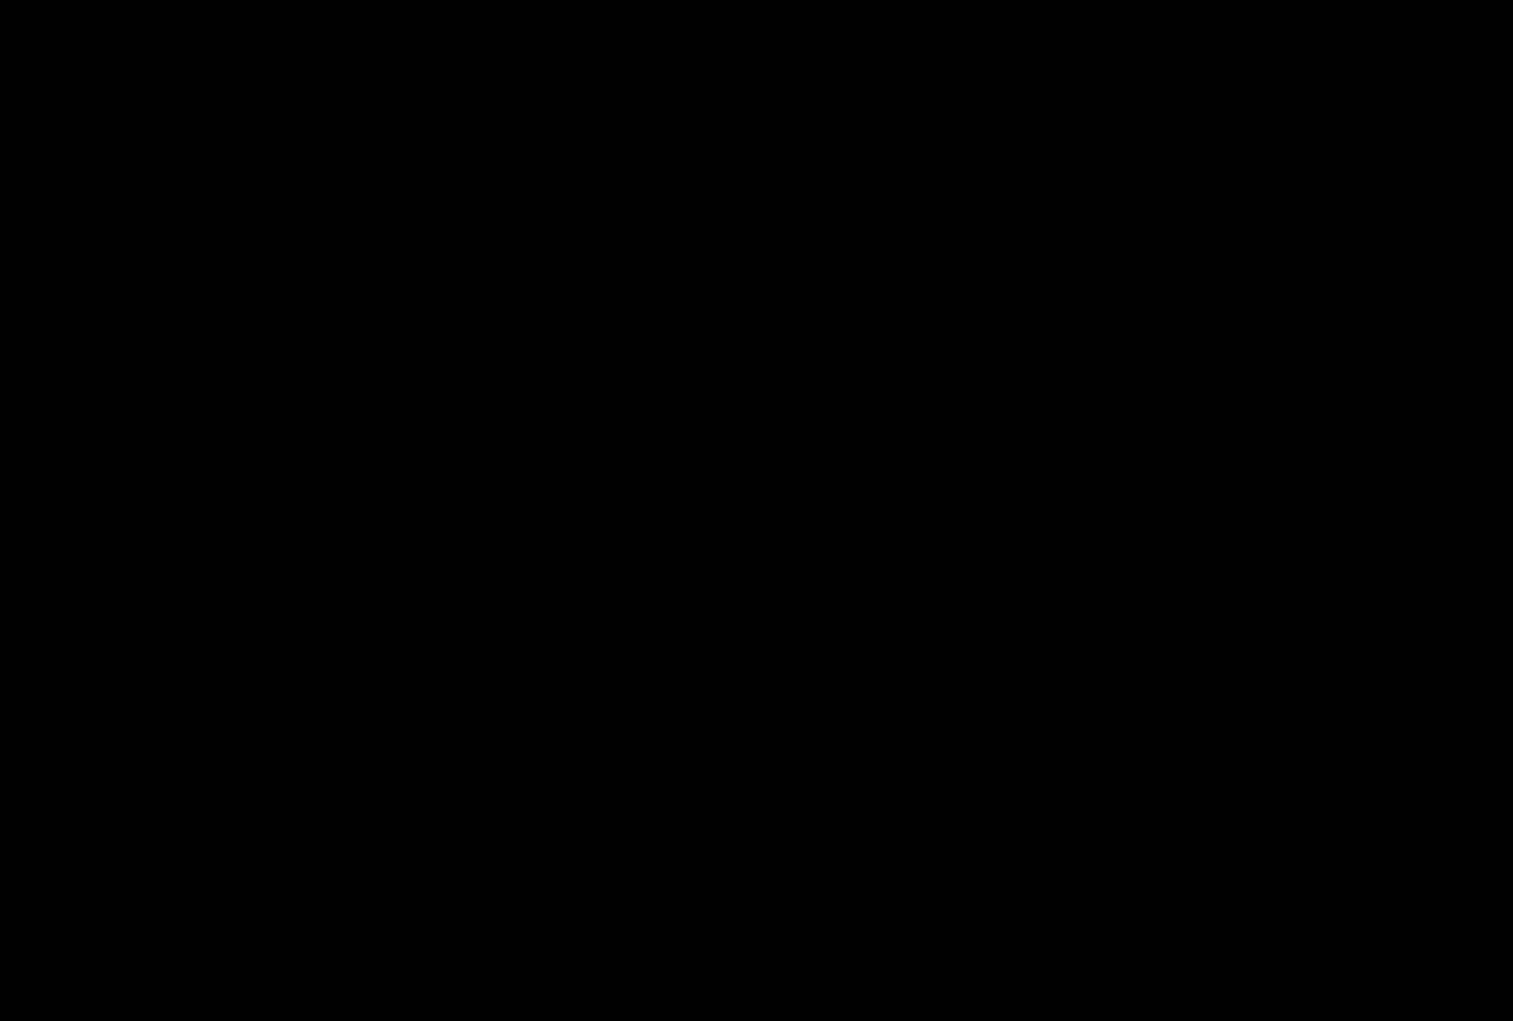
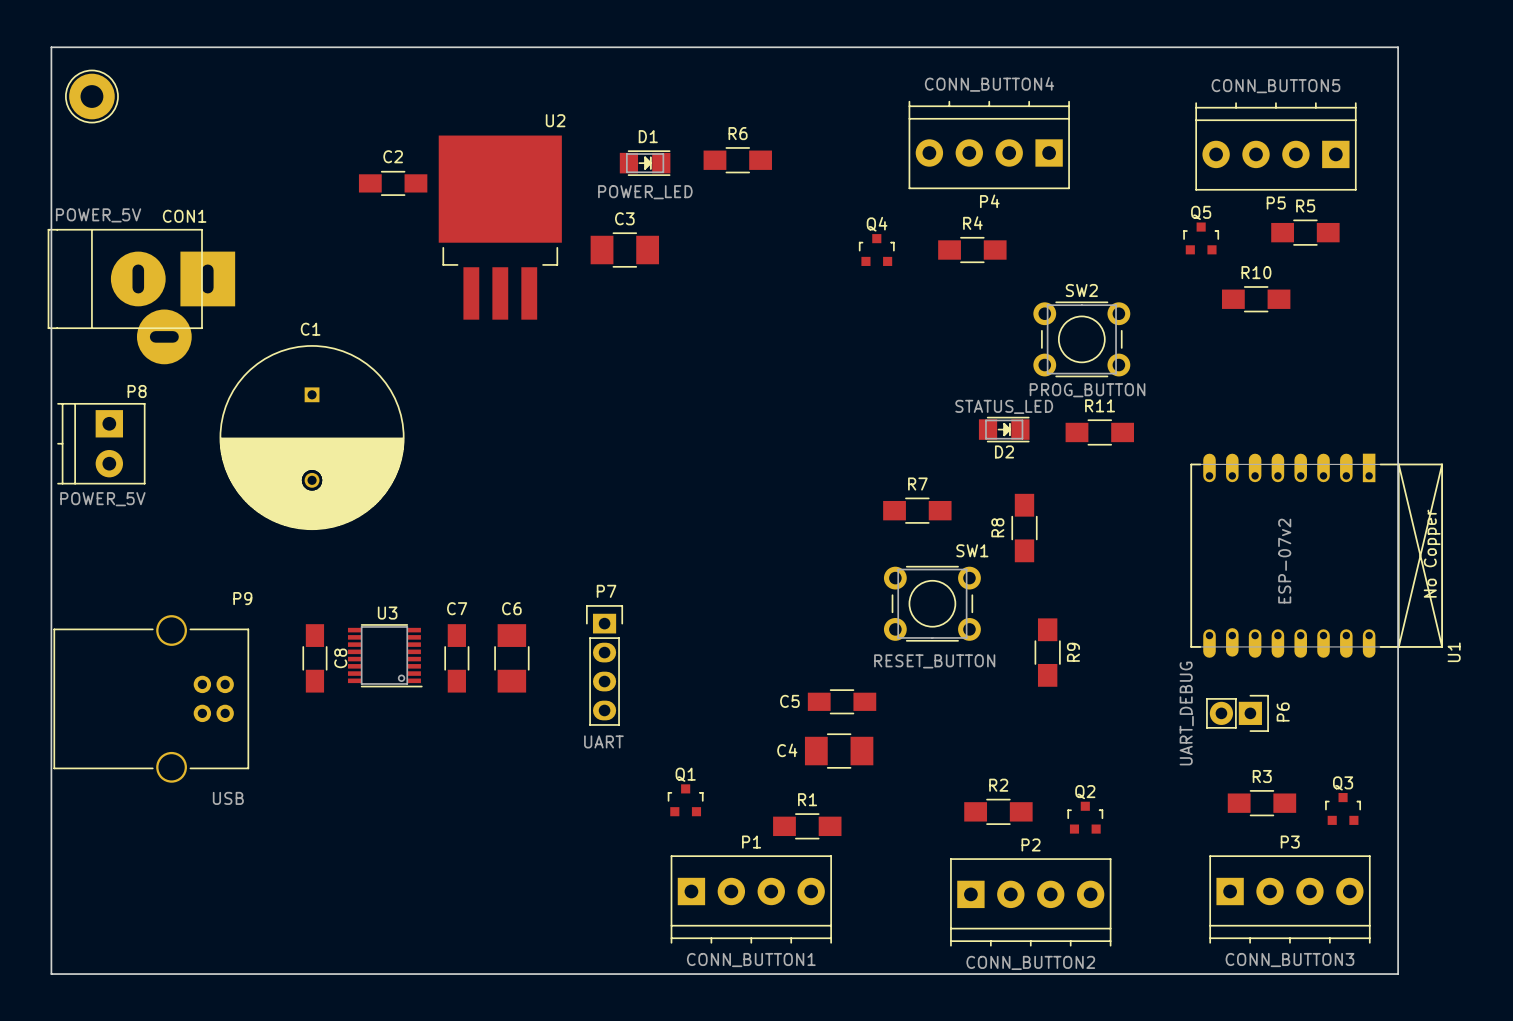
board edge: none -> (51, 47) (1398, 47) (1398, 974) (51, 974) (51, 47)
part: none -> (91, 96)
P4: none -> CONN_BUTTON4 (989, 145)
P5: none -> CONN_BUTTON5 (1275, 146)
R6: none -> (737, 160)
D1: none -> POWER_LED (645, 163)
C2: none -> (393, 183)
U2: none -> (500, 227)
R5: none -> (1305, 232)
Q5: none -> (1201, 238)
C3: none -> (624, 250)
Q4: none -> (876, 250)
R4: none -> (972, 250)
CON1: none -> POWER_5V (141, 296)
R10: none -> (1256, 299)
SW2: none -> PROG_BUTTON (1081, 339)
D2: none -> STATUS_LED (1004, 429)
R11: none -> (1099, 432)
C1: none -> (312, 437)
P8: none -> POWER_5V (101, 443)
R7: none -> (917, 510)
R8: none -> (1024, 528)
U1: none -> ESP-07v2 (1316, 555)
SW1: none -> RESET_BUTTON (932, 603)
R9: none -> (1047, 652)
U3: none -> (385, 655)
C8: none -> (314, 658)
C7: none -> (456, 658)
C6: none -> (511, 658)
P7: none -> UART (604, 665)
P9: none -> USB (151, 698)
C5: none -> (842, 701)
P6: none -> UART_DEBUG (1237, 713)
C4: none -> (839, 751)
Q1: none -> (685, 800)
R3: none -> (1261, 803)
Q3: none -> (1343, 808)
R2: none -> (998, 811)
Q2: none -> (1085, 817)
R1: none -> (807, 826)
P1: none -> CONN_BUTTON1 (751, 899)
P3: none -> CONN_BUTTON3 (1289, 899)
P2: none -> CONN_BUTTON2 (1030, 902)

